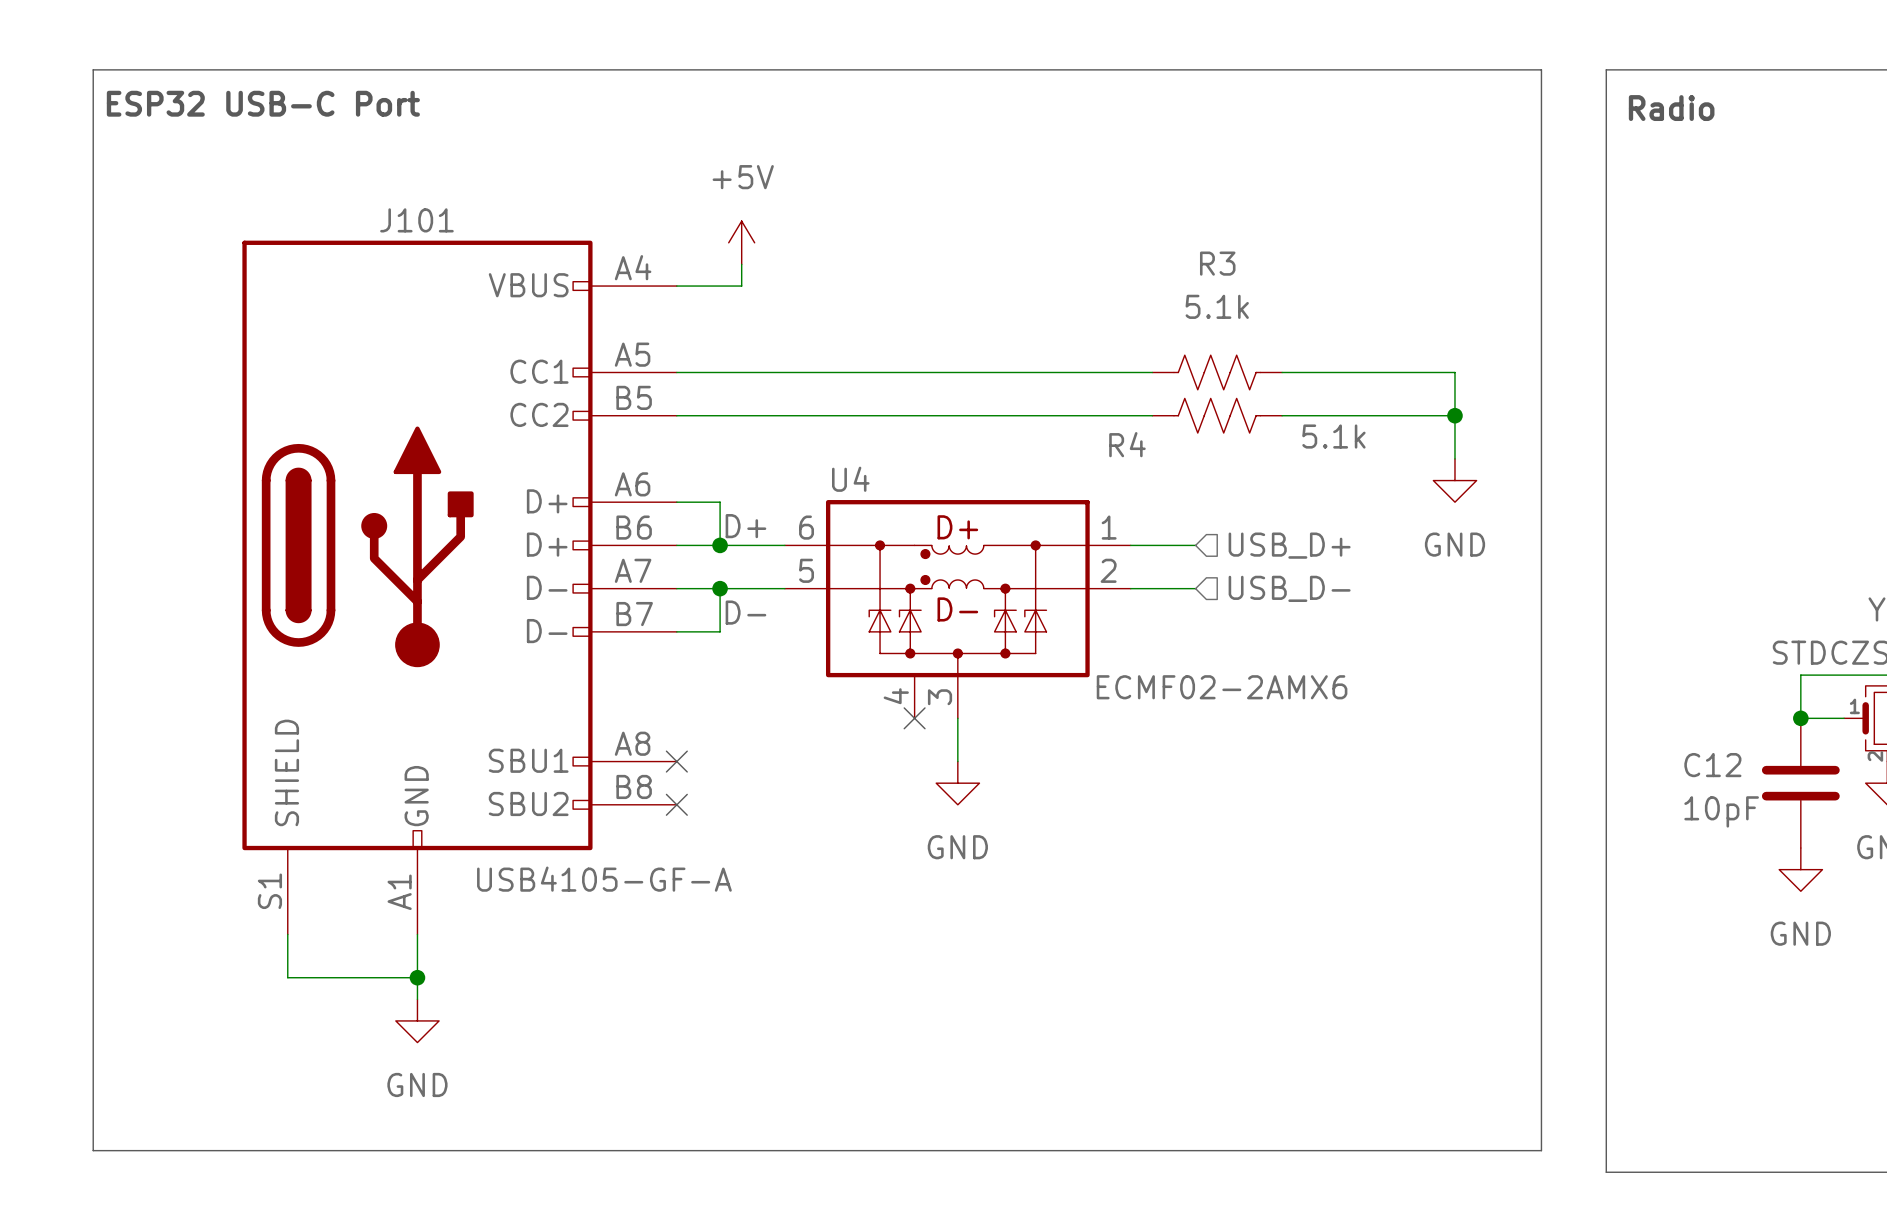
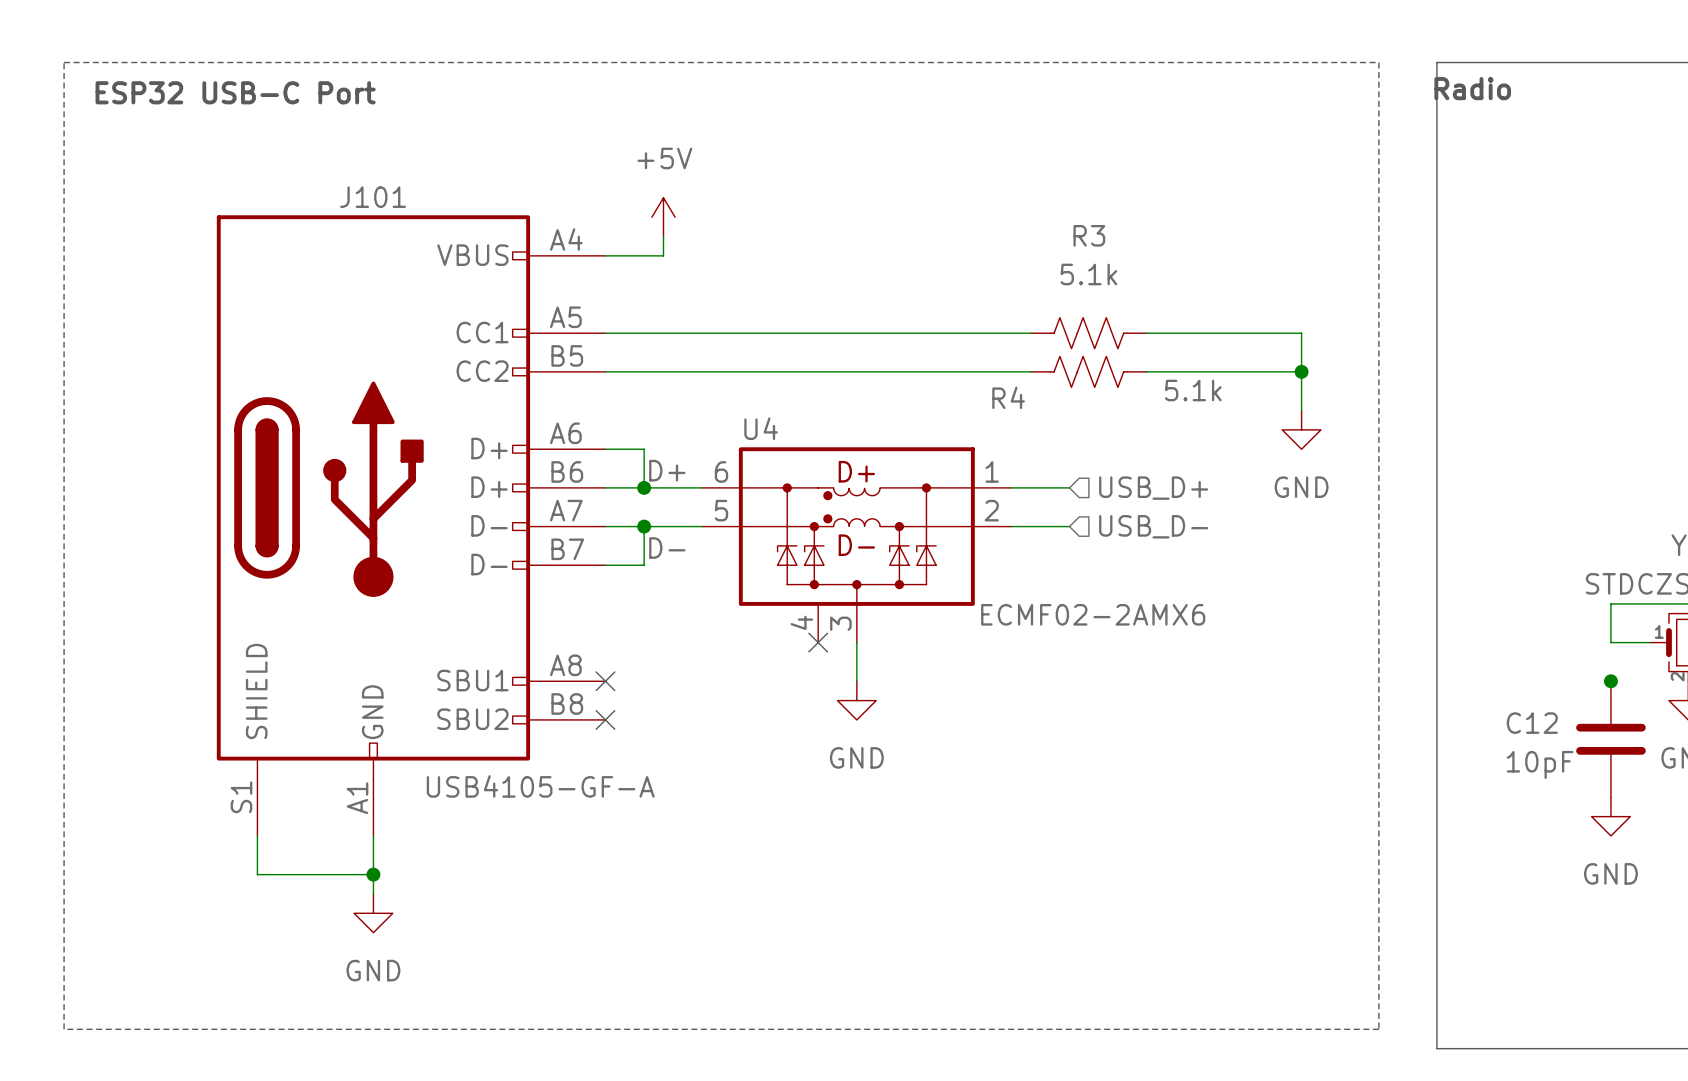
line: (93, 69) (93, 1150) (1541, 1150) (1541, 69) (93, 69) -> (64, 62) (64, 1029) (1378, 1029) (1378, 62) (64, 62)
text position: Radio (1671, 108) -> Radio (1472, 88)
junction position: (1800, 718) -> (1610, 681)
C12 position: (1800, 783) -> (1610, 739)
power symbol position: GND (1800, 869) -> GND (1610, 816)

